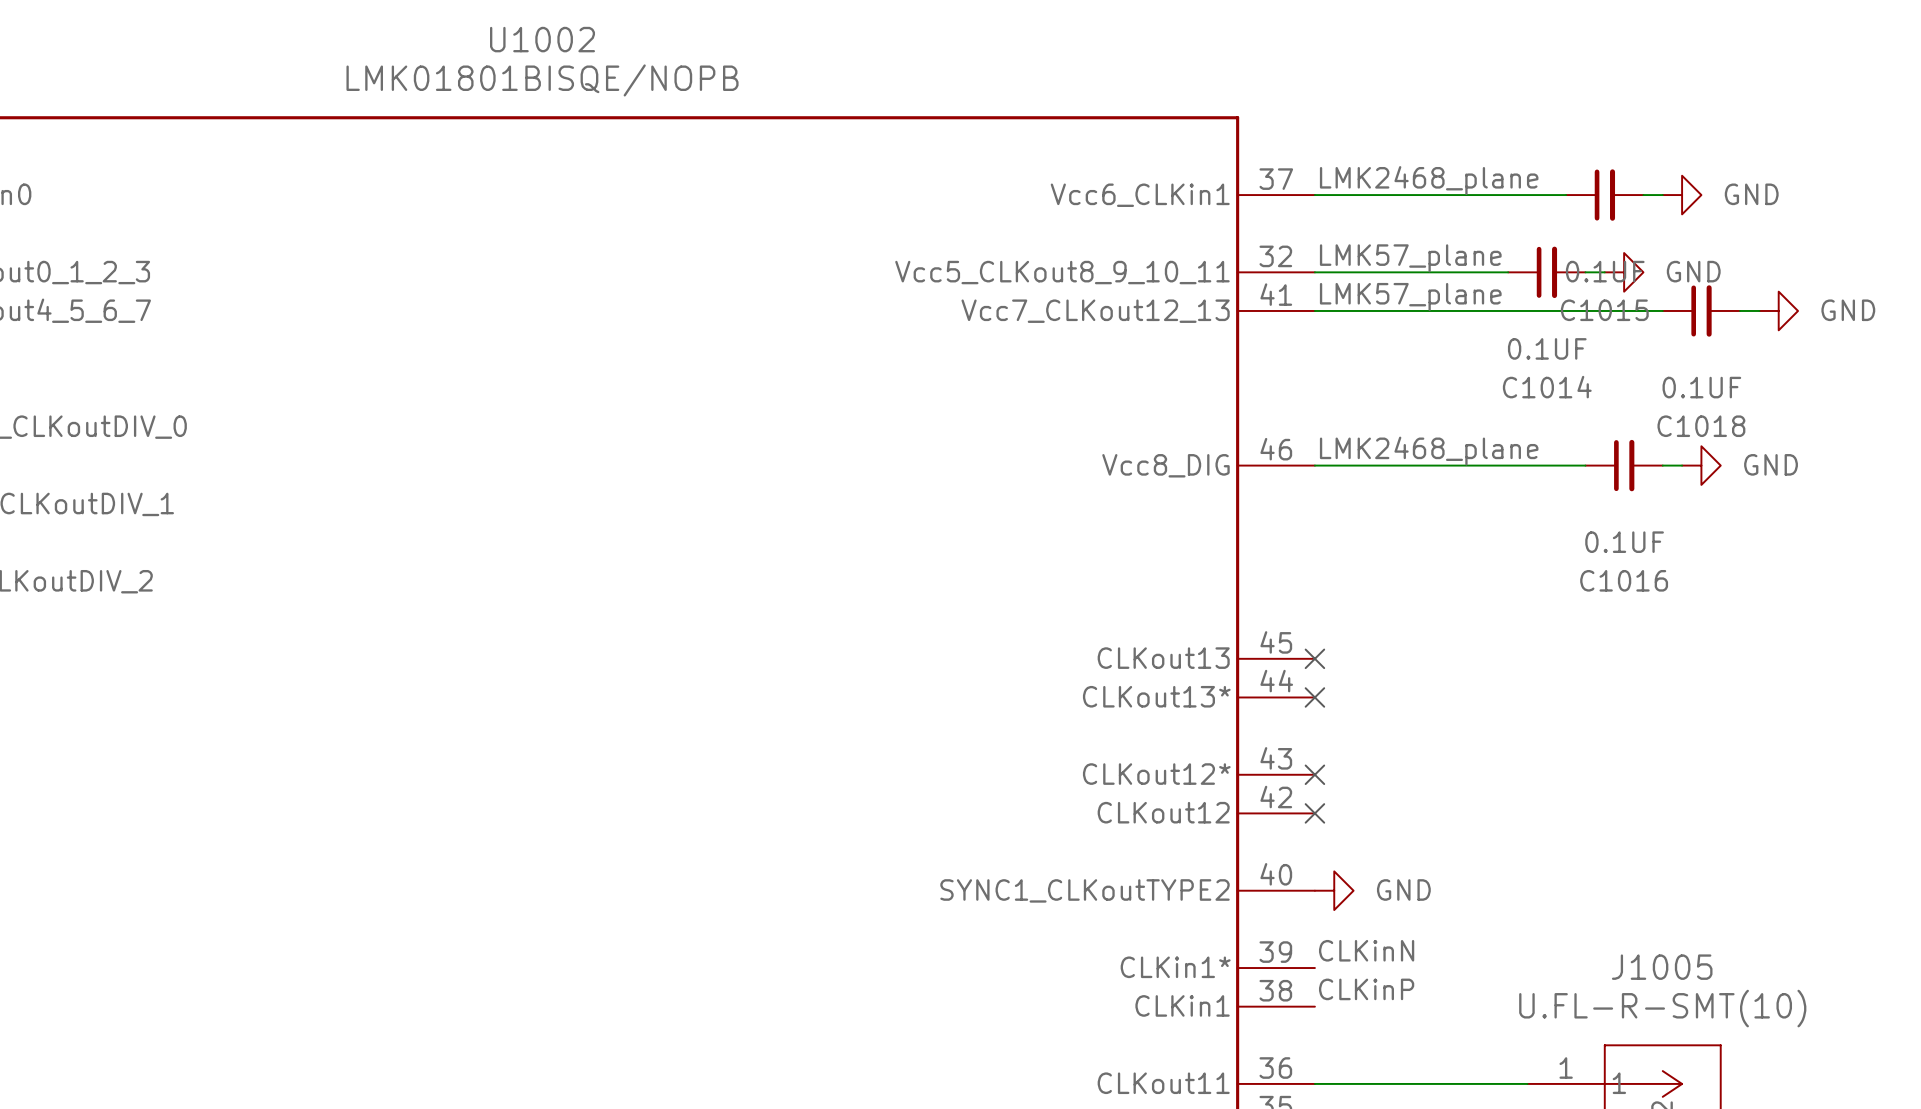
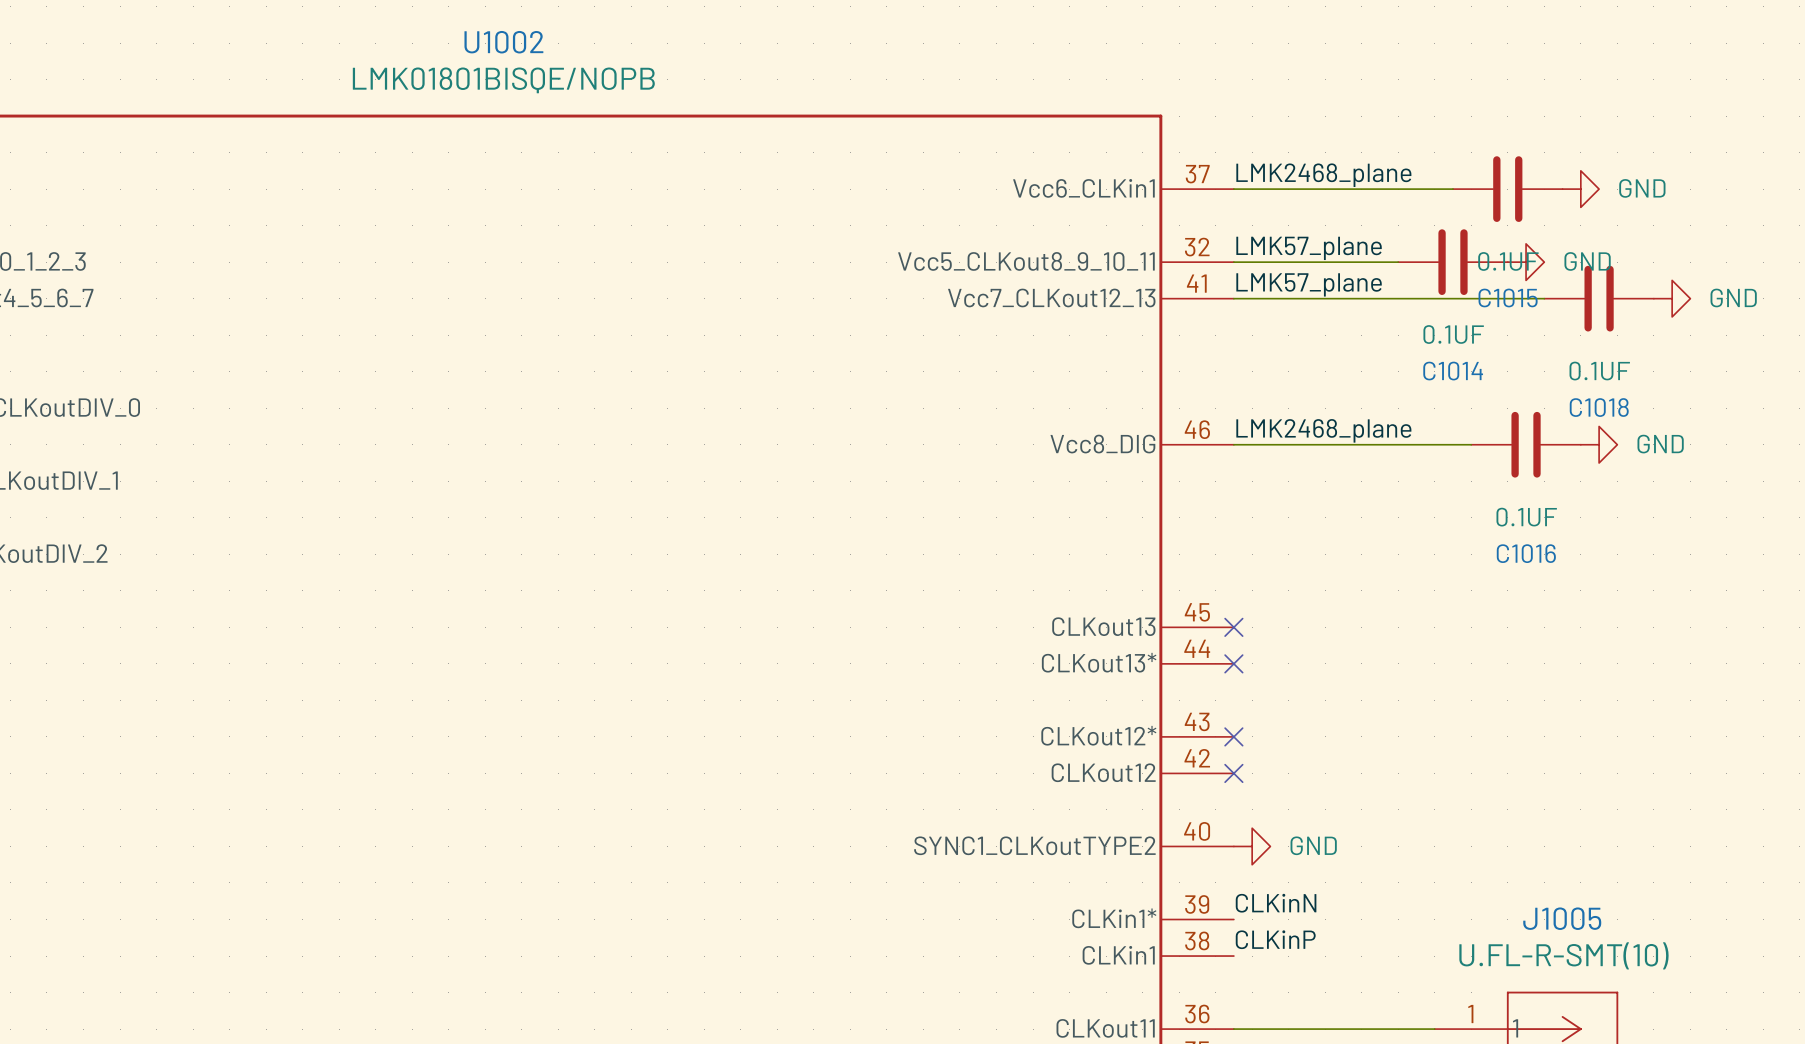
C1015 symbol: [1566, 169, 1644, 221] -> [1453, 156, 1563, 222]
C1014 symbol: [1508, 246, 1586, 299] -> [1398, 229, 1508, 296]
C1018 symbol: [1662, 285, 1741, 337] -> [1544, 265, 1654, 332]
C1016 symbol: [1585, 439, 1663, 492] -> [1471, 411, 1581, 478]

